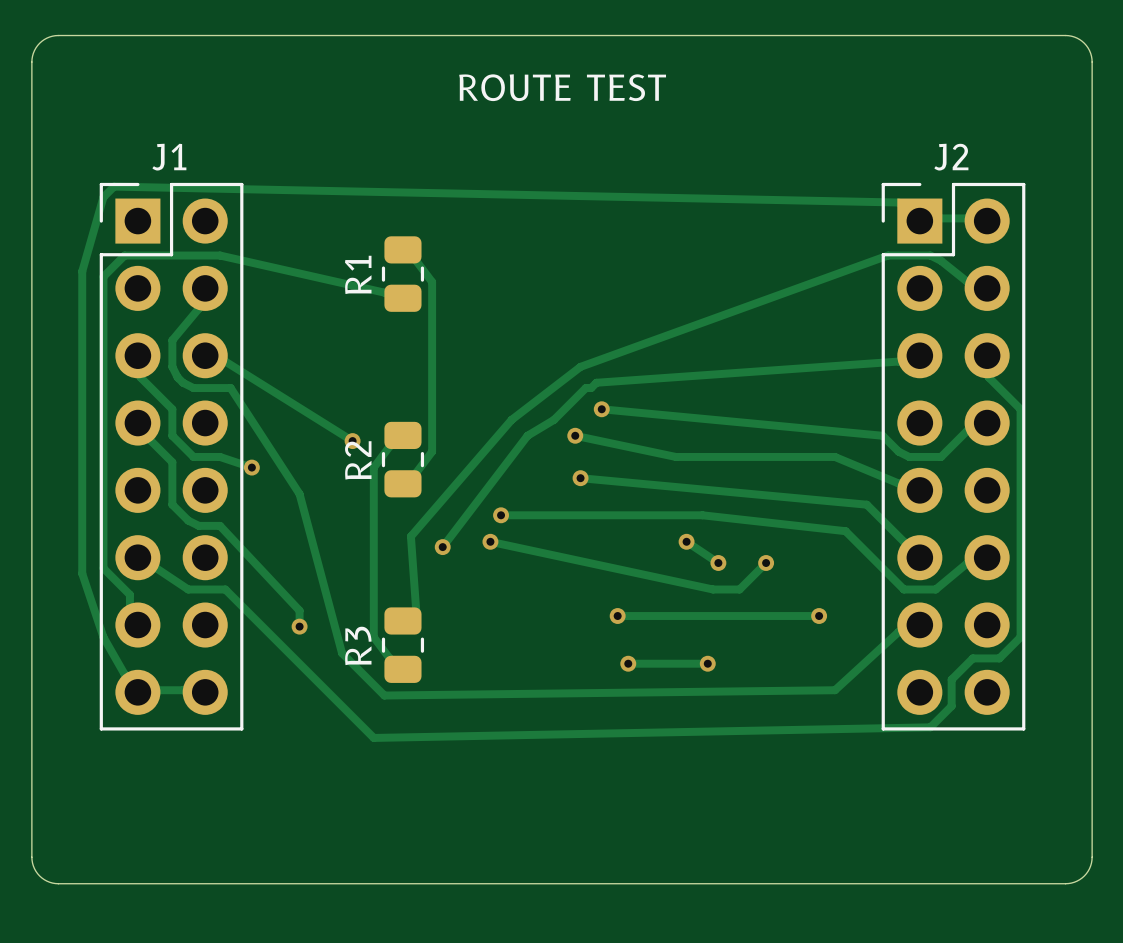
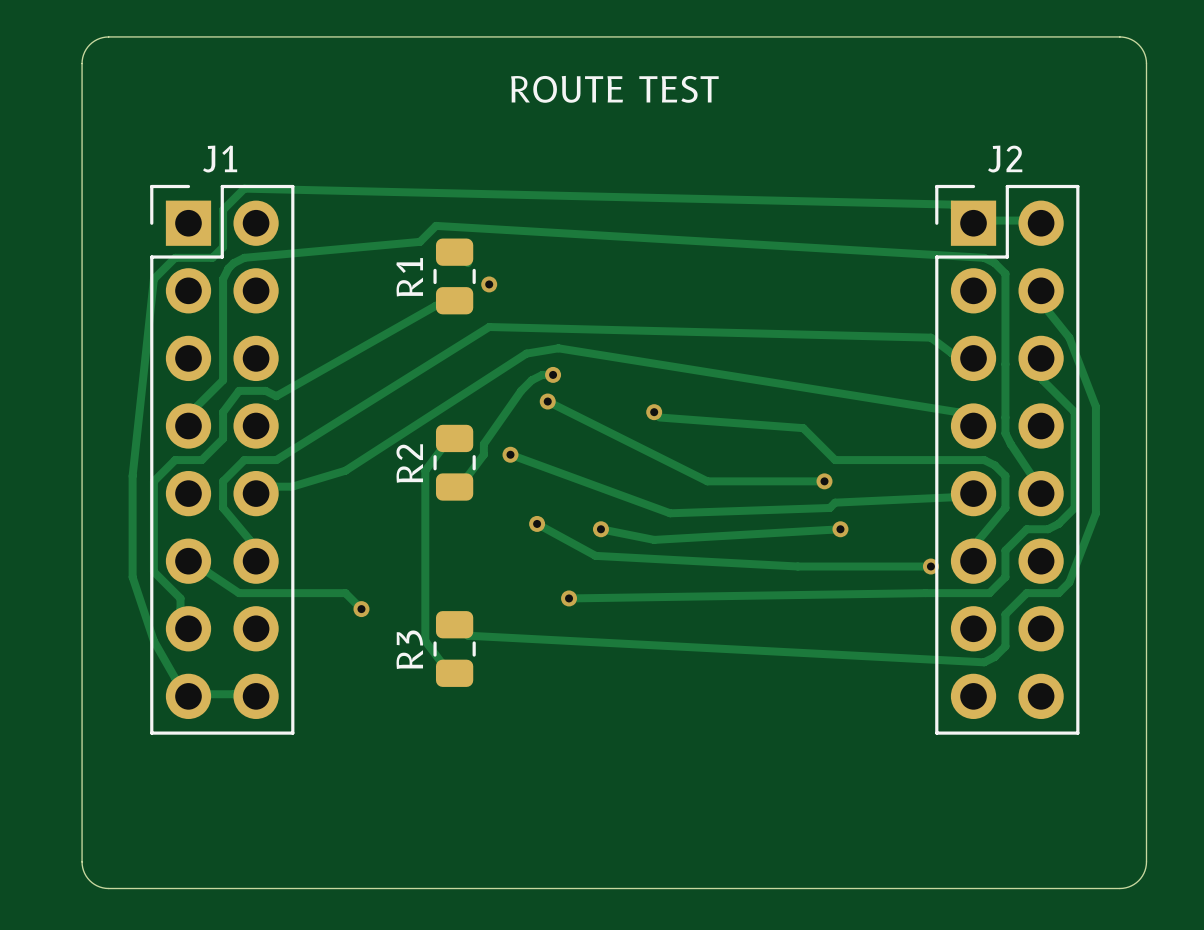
track: (898, 202) (114, 186) (103, 197) (82, 271) (82, 472) -> (952, 204) (244, 188) (223, 209) (223, 247) (212, 257)
track: (161, 255) (220, 255) (402, 298) -> (265, 390) (276, 396) (435, 305) (454, 300)
track: (930, 255) (888, 255) (580, 366) (511, 419) (410, 536) (416, 610) (402, 620) -> (1041, 290) (1048, 311) (1069, 337) (1095, 406) (1095, 513) (1069, 582) (1058, 593) (1026, 593) (1005, 614) (1005, 646) (994, 656) (984, 662) (467, 635) (454, 624)
track: (416, 260) (432, 282) (432, 441) -> (553, 374) (542, 374) (531, 380) (521, 390) (483, 444)
track: (941, 260) (967, 282) (987, 288) -> (994, 263) (1005, 273) (1005, 433) (1041, 493)
track: (103, 276) (103, 478) -> (153, 279) (132, 476)
via: none -> (489, 284)
track: (205, 288) (198, 308) (172, 340) -> (984, 257) (435, 225) (420, 241) (244, 257) (233, 263) (223, 279) (223, 342)
track: (137, 355) (140, 377) (172, 409) -> none
track: (205, 355) (225, 361) (352, 441) -> none
track: (919, 355) (898, 361) (596, 382) (591, 388) (585, 388) (554, 419) (527, 435) (442, 547) -> (973, 358) (952, 353) (930, 337) (489, 327) (276, 460) (270, 460)
track: (172, 366) (177, 377) (193, 388) -> (223, 412) (239, 390) (244, 390)
via: none -> (553, 374)
track: (214, 388) (230, 388) (299, 494) (342, 653) (384, 695) (835, 690) (898, 631) (919, 625) -> none
track: none -> (547, 401) (707, 481) (824, 481)
via: none -> (547, 401)
track: (601, 409) (882, 435) (898, 451) (909, 456) -> none
track: (137, 423) (151, 441) (172, 462) (172, 478) -> (188, 426) (196, 406) (223, 380) (223, 369)
track: none -> (973, 426) (957, 412) (558, 348) (526, 353) (345, 470) (292, 486) (276, 486) (256, 493)
track: (987, 423) (967, 430) (941, 456) (930, 456) -> (973, 561) (978, 539) (1005, 507) (1005, 476) (994, 465) (984, 460)
track: (172, 435) (193, 456) -> (223, 481) (244, 460)
track: none -> (223, 438) (201, 460) (175, 460) (153, 481)
track: (575, 435) (675, 456) (782, 456) -> (659, 417) (803, 428) (835, 460)
via: (575, 435) -> none
via: (352, 441) -> none
track: none -> (510, 454) (670, 513) (829, 507) (835, 502) (952, 497) (973, 493)
via: none -> (510, 454)
track: (220, 456) (251, 467) -> none
track: (835, 456) (919, 490) -> (888, 460) (962, 460)
via: (251, 467) -> none
track: (580, 478) (866, 504) (919, 557) -> none
via: (580, 478) -> none
via: none -> (824, 481)
track: (172, 504) (188, 520) (198, 525) (220, 525) (299, 610) (299, 626) -> (223, 507) (249, 539) (256, 561)
track: (1020, 504) (1020, 637) (999, 658) (972, 658) (951, 679) (951, 706) (930, 727) (373, 737) (225, 589) -> (361, 609) (345, 593) (276, 593)
track: (501, 515) (702, 515) (845, 531) (903, 589) -> (569, 598) (957, 593)
via position: (501, 515) -> (537, 523)
track: none -> (537, 523) (595, 555) (797, 566) (930, 566)
track: none -> (600, 529) (654, 539) (840, 529)
via: none -> (600, 529)
via: none -> (840, 529)
track: (490, 541) (713, 589) (739, 589) (766, 563) -> none
via: (490, 541) -> none
track: (686, 541) (718, 563) -> none
via: (686, 541) -> none
via: (442, 547) -> none
track: (987, 557) (967, 563) (935, 589) -> (1074, 507) (1058, 523) (1048, 529) (1026, 529) (1005, 550) (1005, 577) (989, 593)
via: (718, 563) -> none
via: (766, 563) -> none
via: none -> (930, 566)
via: none -> (569, 598)
track: (617, 616) (819, 616) -> none
via: (617, 616) -> none
via: (819, 616) -> none
via position: (299, 626) -> (361, 609)
track: (628, 663) (707, 663) -> none
via: (628, 663) -> none
via: (707, 663) -> none

